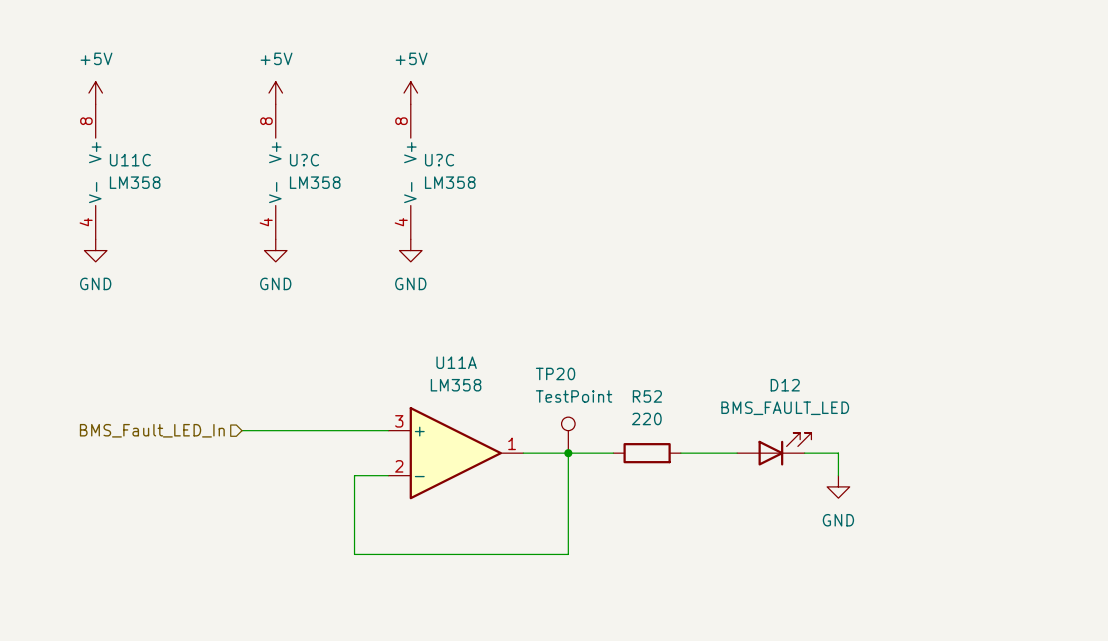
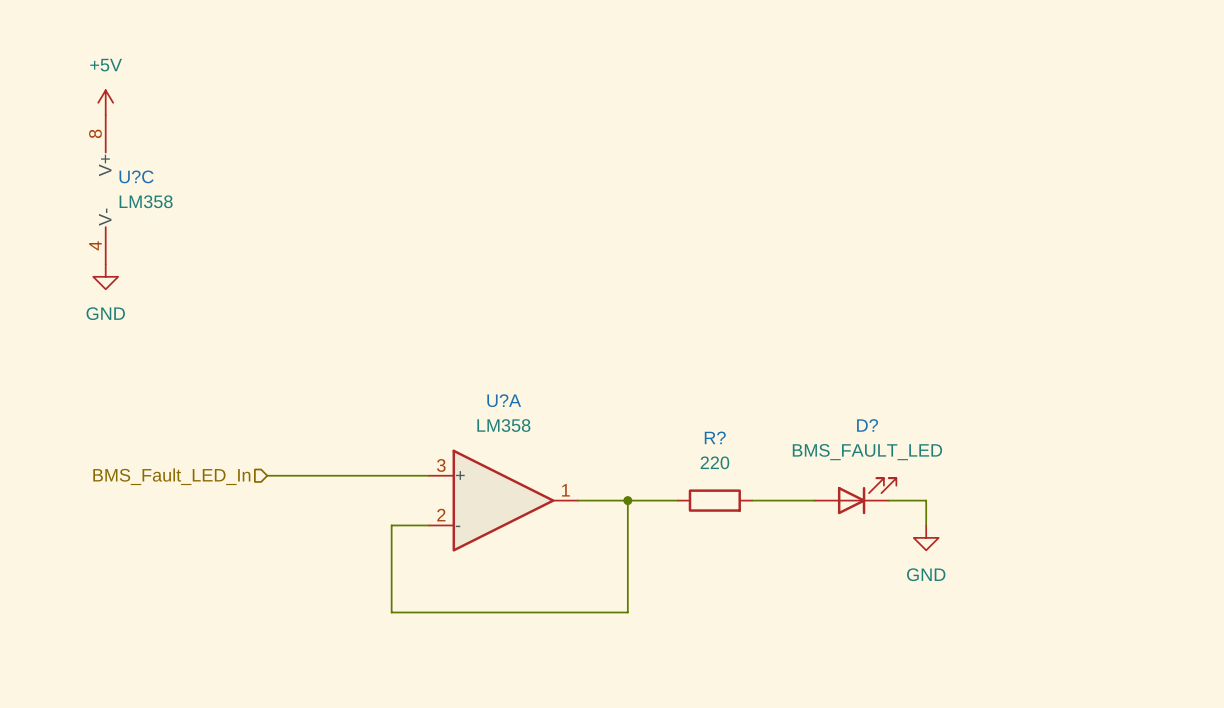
power symbol: +5V (275, 93) -> none
power symbol: +5V (410, 93) -> none
U11C name: U11C (130, 160) -> U?C (136, 176)
U?C: LM358 (275, 171) -> none
U?C: LM358 (410, 171) -> none
power symbol: GND (275, 250) -> none
power symbol: GND (410, 250) -> none
U11A name: U11A (456, 362) -> U?A (504, 400)
D12 name: D12 (785, 385) -> D? (867, 425)
R52 name: R52 (647, 396) -> R? (715, 437)
TP20: TestPoint (568, 435) -> none

